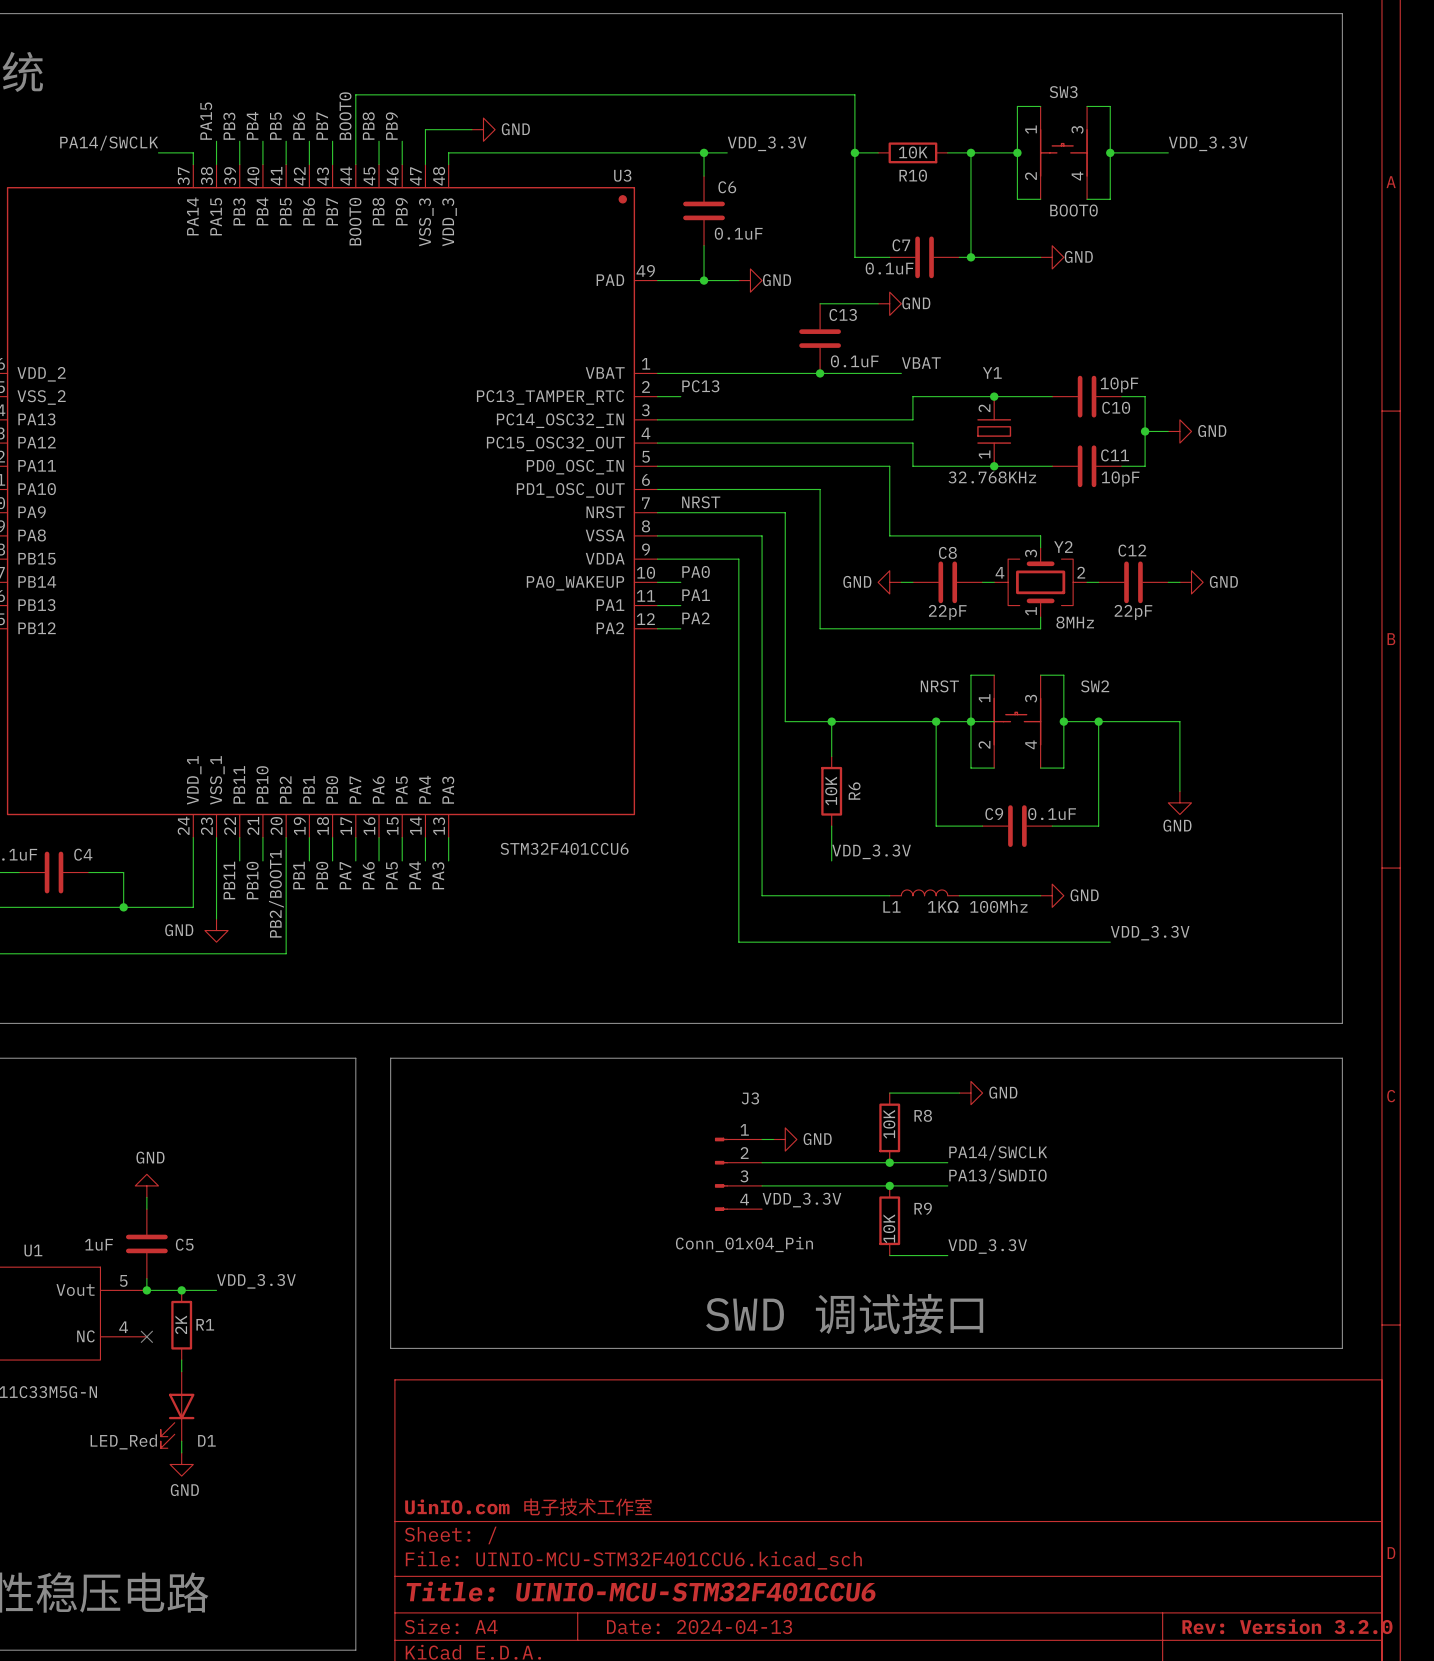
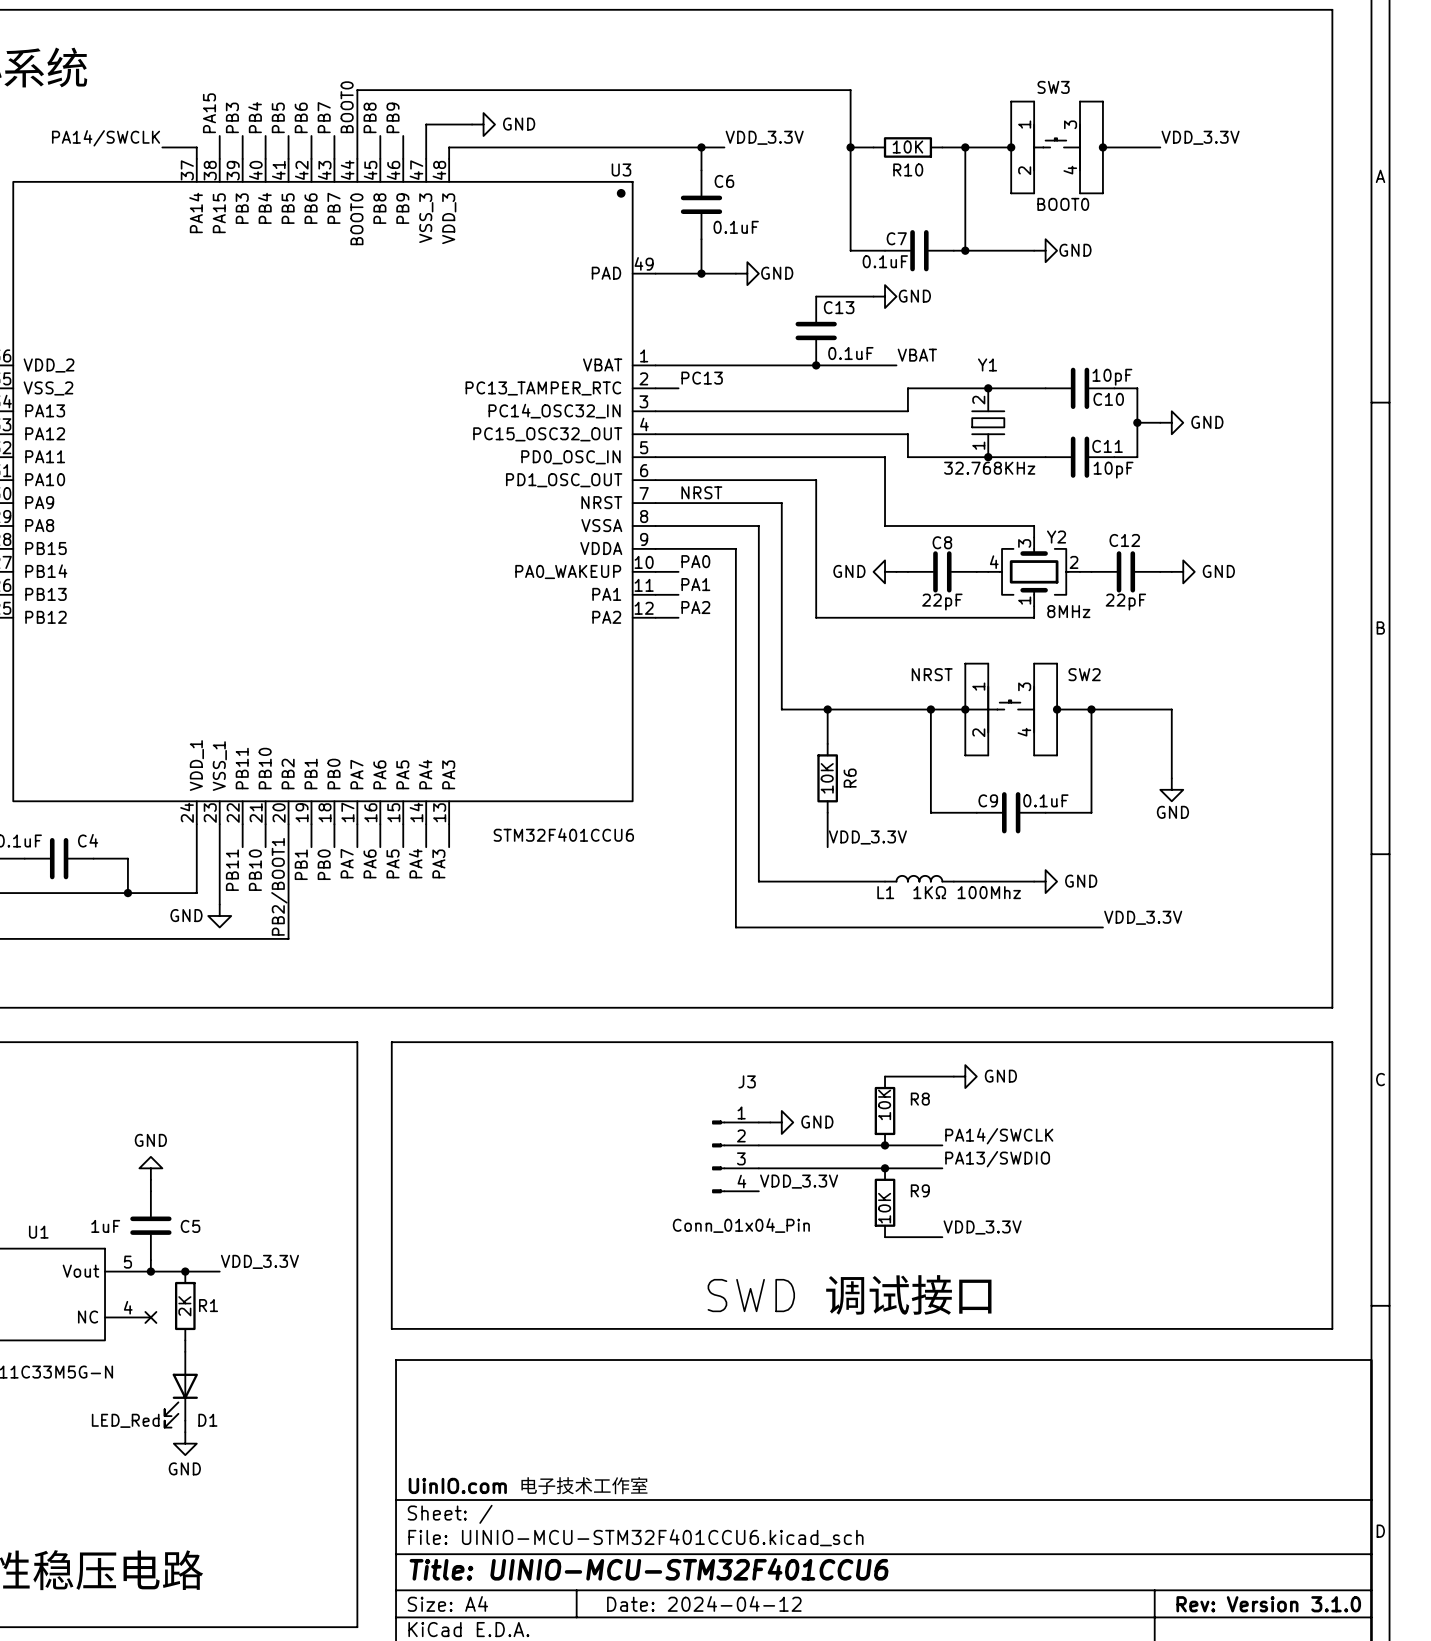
title block: Rev: Version 3.2.0 (1287, 1626) -> Rev: Version 3.1.0 (1268, 1604)
title block: Date: 2024-04-13 (699, 1627) -> Date: 2024-04-12 (704, 1603)

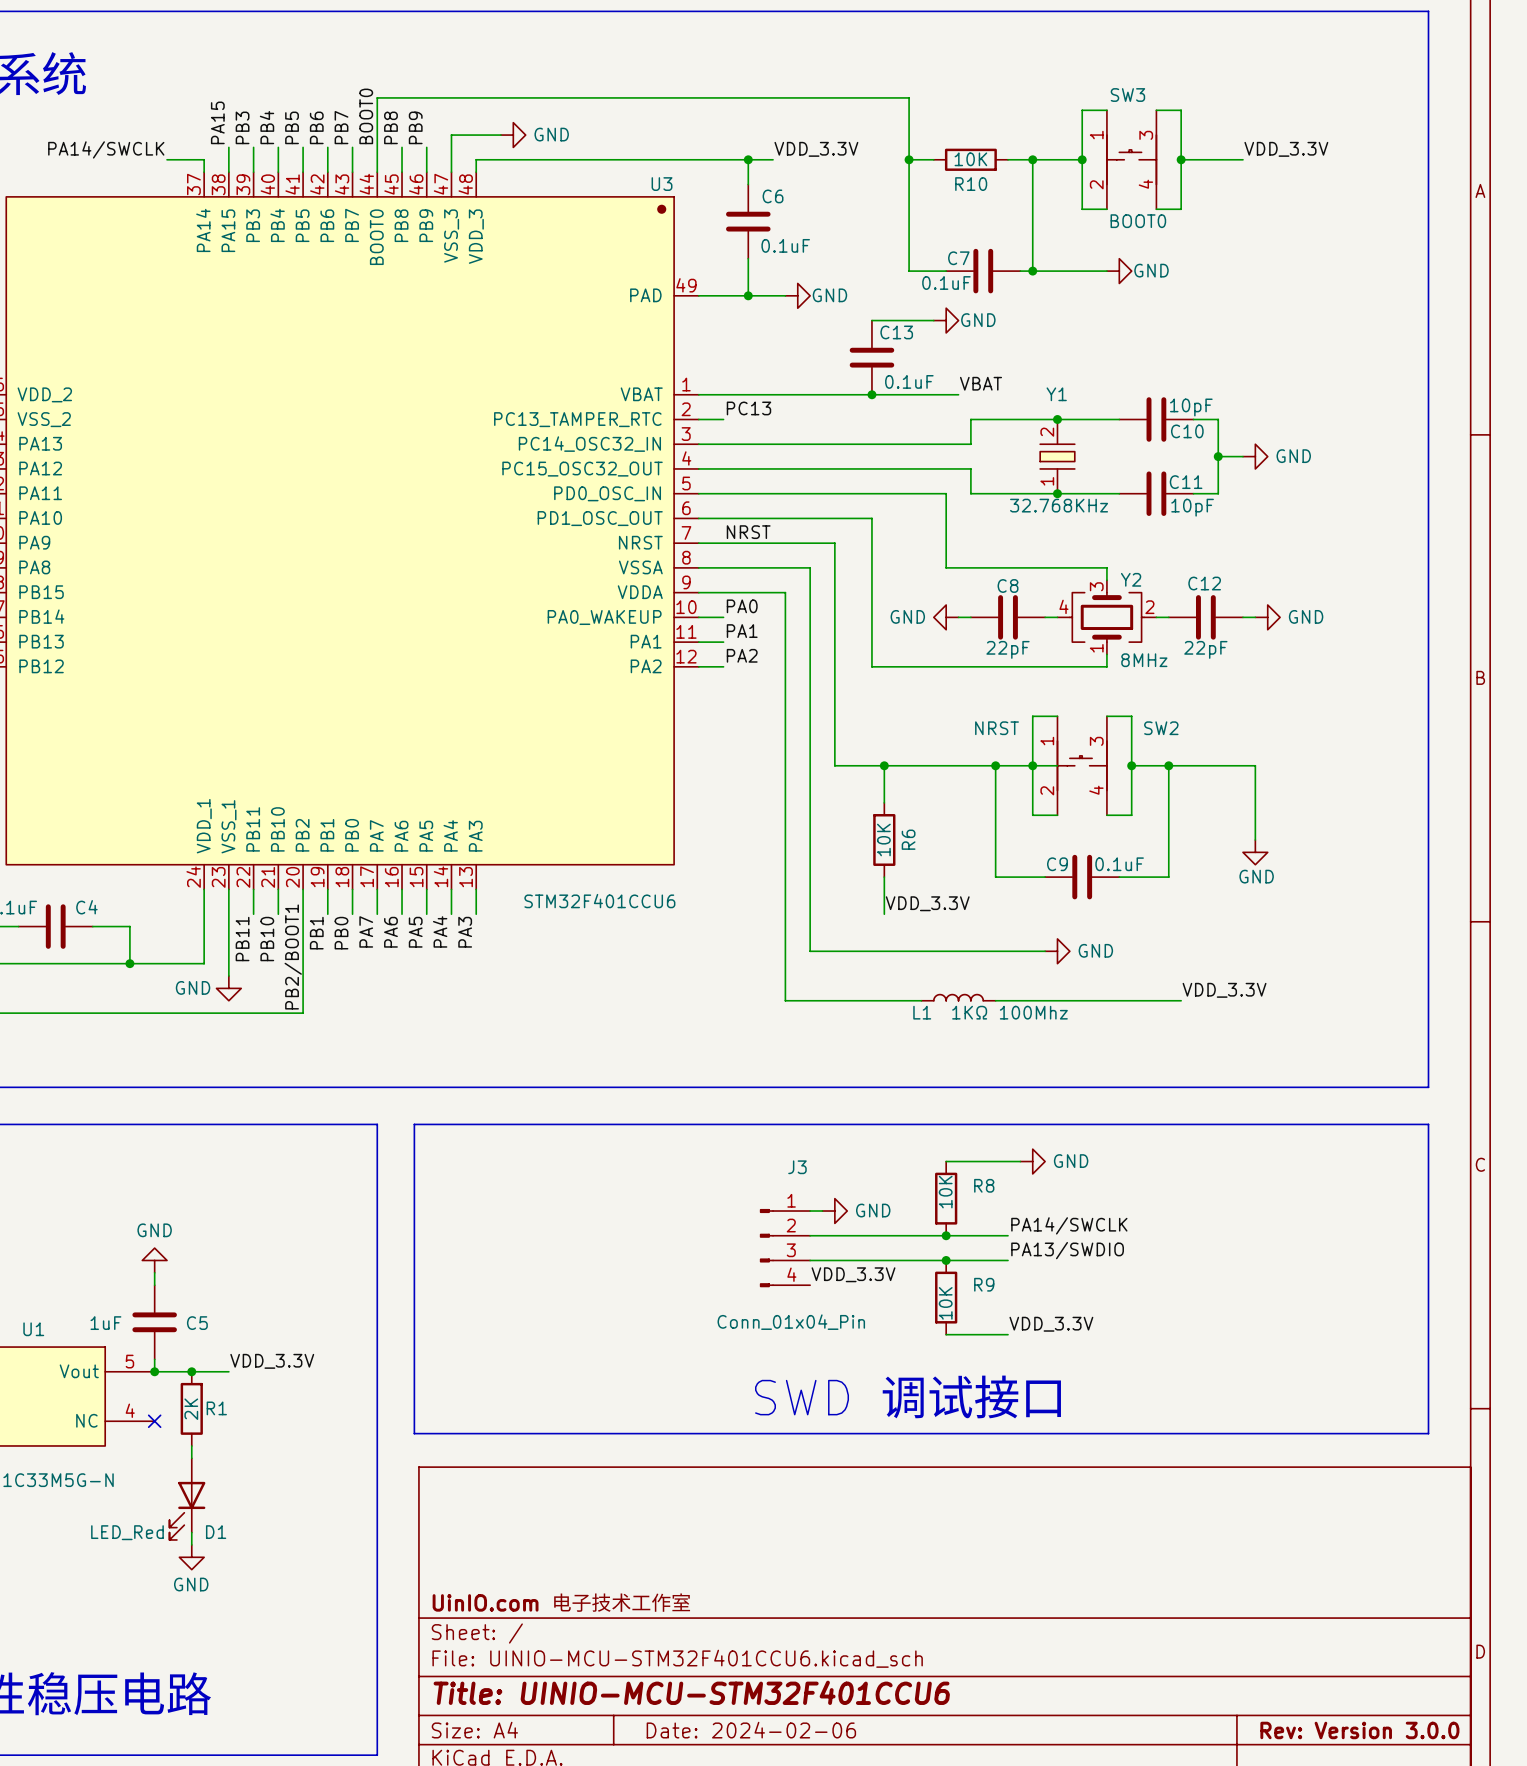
L1 position: (919, 878) -> (958, 997)
wire: (976, 881) (1034, 881) -> none
power symbol position: GND (1045, 881) -> GND (1057, 951)
wire: (862, 927) (930, 927) -> (946, 951) (1020, 951)
title block: Date: 2024-04-12 (704, 1603) -> Date: 2024-02-06 (751, 1730)
title block: Rev: Version 3.1.0 (1268, 1604) -> Rev: Version 3.0.0 (1359, 1730)

